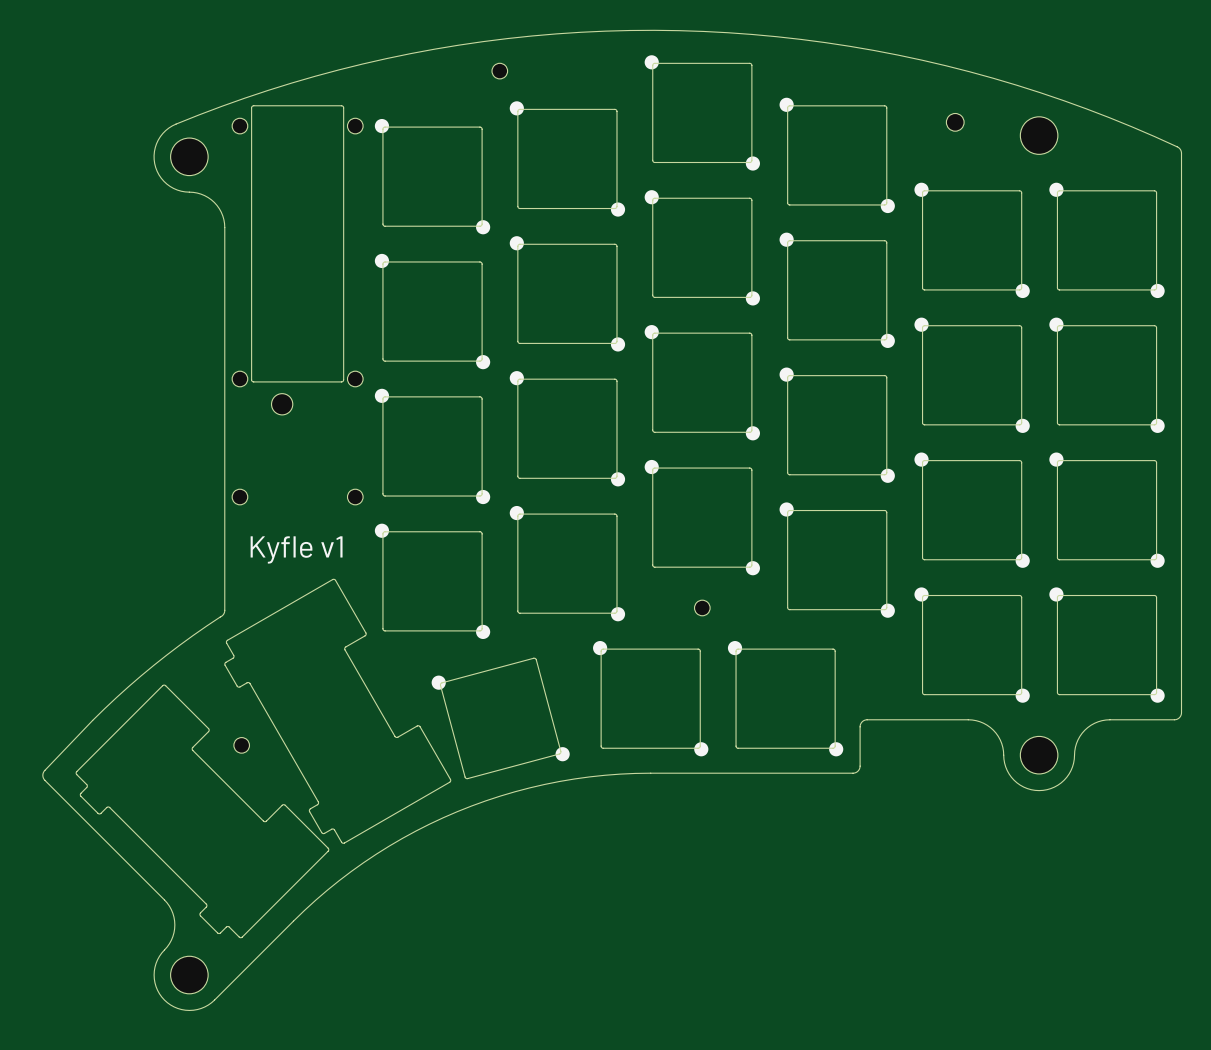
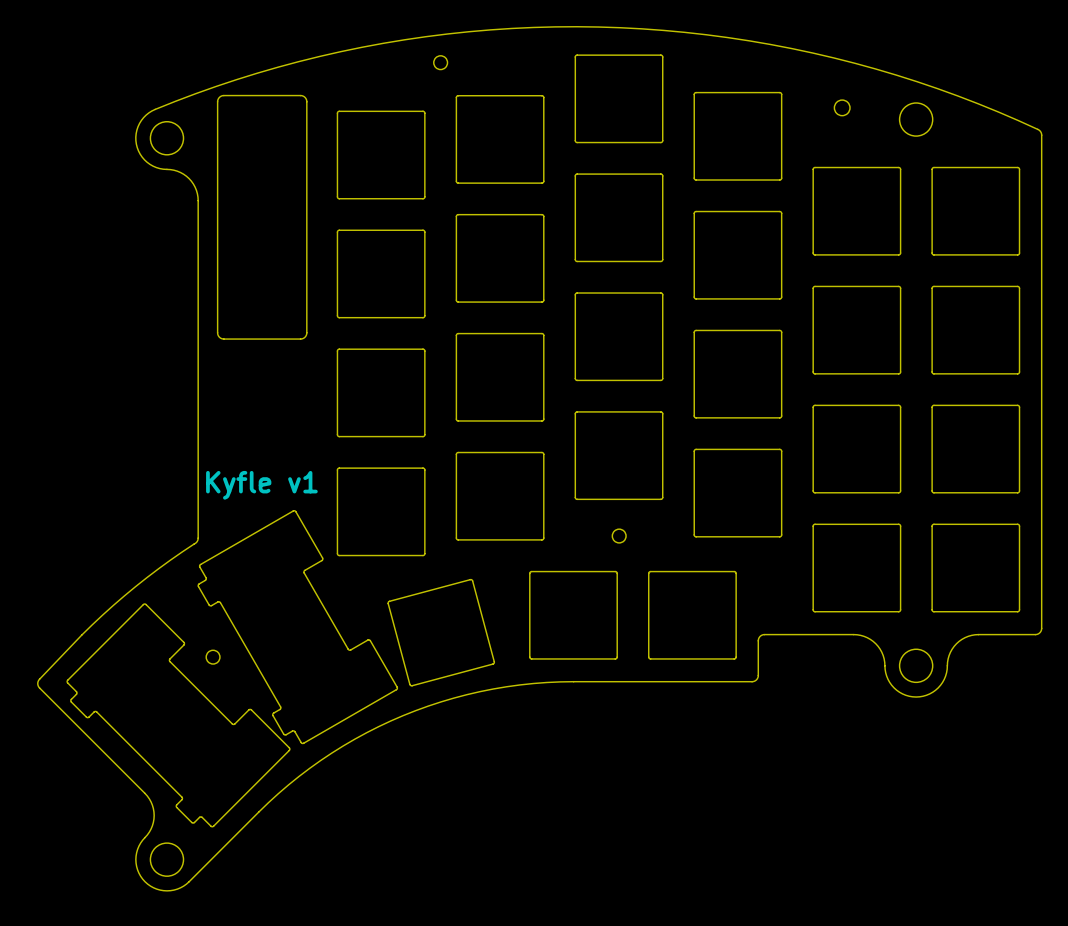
drawing shape: [644, 55, 760, 171] -> [574, 54, 664, 143]
drawing shape: [779, 97, 895, 214] -> [693, 92, 783, 181]
drawing shape: [509, 101, 626, 217] -> [456, 95, 545, 184]
drawing: none -> [217, 95, 308, 340]
drawing shape: [374, 118, 491, 235] -> [337, 110, 426, 200]
part: (239, 126) -> none
part: (355, 126) -> none
drawing shape: [914, 182, 1030, 299] -> [812, 167, 901, 256]
drawing shape: [1049, 182, 1165, 299] -> [931, 167, 1020, 256]
drawing shape: [644, 190, 760, 306] -> [574, 173, 664, 262]
drawing shape: [779, 232, 895, 348] -> [693, 211, 783, 300]
drawing shape: [509, 236, 626, 352] -> [456, 214, 545, 303]
drawing shape: [374, 253, 491, 370] -> [337, 229, 426, 319]
part: (297, 260) -> none
drawing shape: [914, 317, 1030, 433] -> [812, 286, 901, 375]
drawing shape: [1049, 317, 1165, 433] -> [931, 286, 1020, 375]
drawing shape: [644, 325, 760, 441] -> [574, 292, 664, 381]
drawing shape: [779, 367, 895, 483] -> [693, 330, 783, 419]
drawing shape: [509, 371, 626, 487] -> [456, 333, 545, 422]
part: (239, 378) -> none
part: (355, 378) -> none
drawing shape: [374, 388, 491, 505] -> [337, 348, 426, 437]
drawing shape: [914, 452, 1030, 568] -> [812, 405, 901, 494]
drawing shape: [1049, 452, 1165, 568] -> [931, 405, 1020, 494]
drawing shape: [644, 459, 760, 576] -> [574, 411, 664, 500]
part: (239, 497) -> none
part: (355, 497) -> none
drawing shape: [779, 502, 895, 618] -> [693, 449, 783, 538]
drawing shape: [509, 505, 626, 622] -> [456, 452, 545, 541]
drawing shape: [374, 523, 491, 640] -> [337, 467, 426, 556]
drawing shape: [914, 587, 1030, 703] -> [812, 523, 901, 613]
drawing shape: [1049, 587, 1165, 703] -> [931, 523, 1020, 613]
drawing shape: [593, 641, 709, 757] -> [529, 571, 618, 660]
drawing shape: [727, 641, 844, 757] -> [648, 571, 737, 660]
drawing shape: [431, 657, 570, 780] -> [387, 579, 495, 687]

